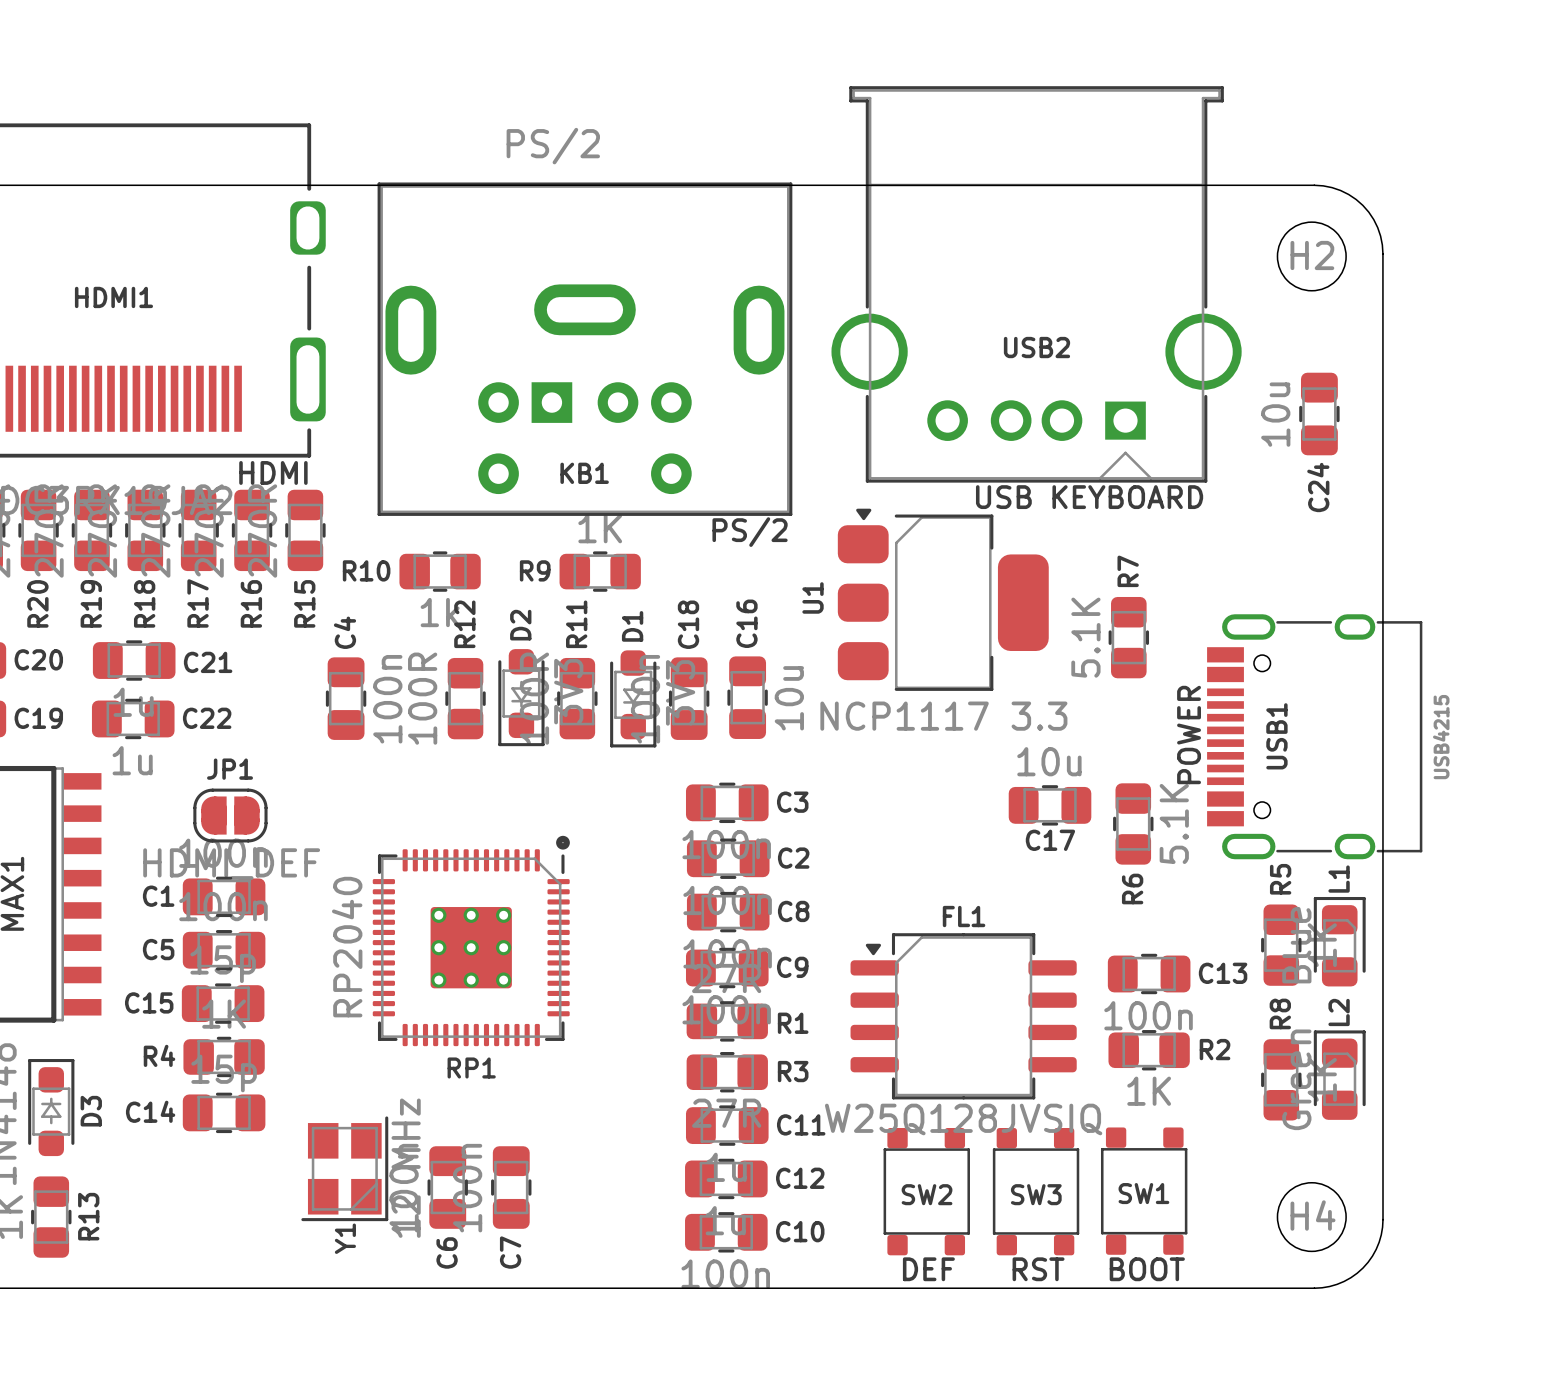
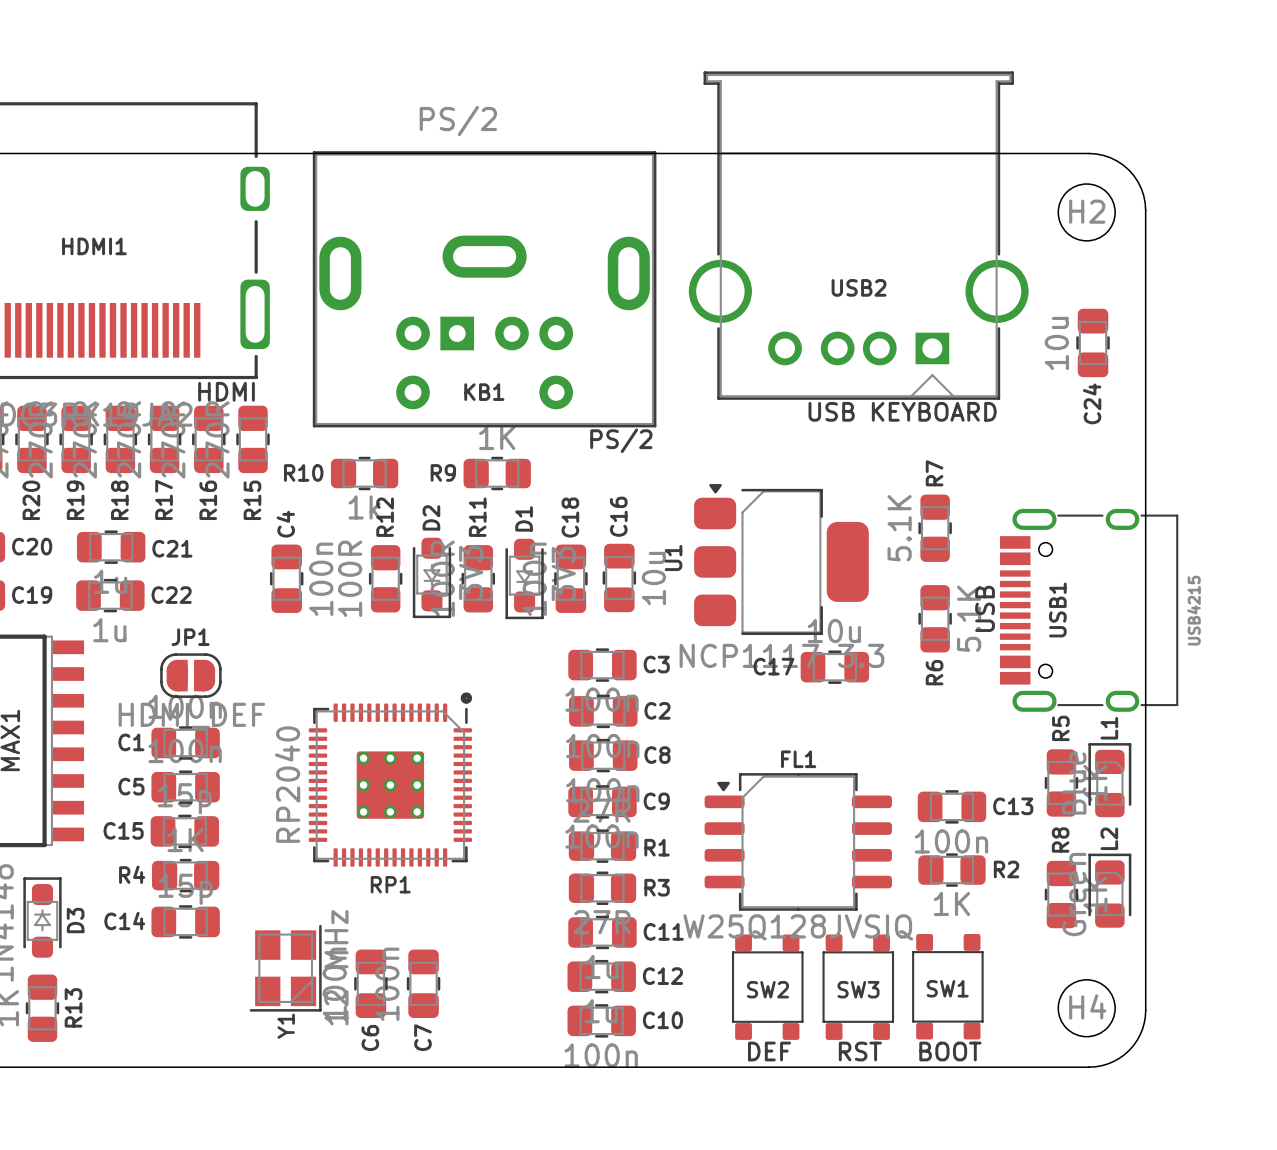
U1 position: (943, 599) -> (781, 559)
text: POWER (1189, 735) -> USB (985, 608)
C17 position: (1050, 805) -> (834, 667)
R6 position: (1133, 823) -> (935, 618)
C17 name position: C17 (1050, 840) -> C17 (773, 666)

